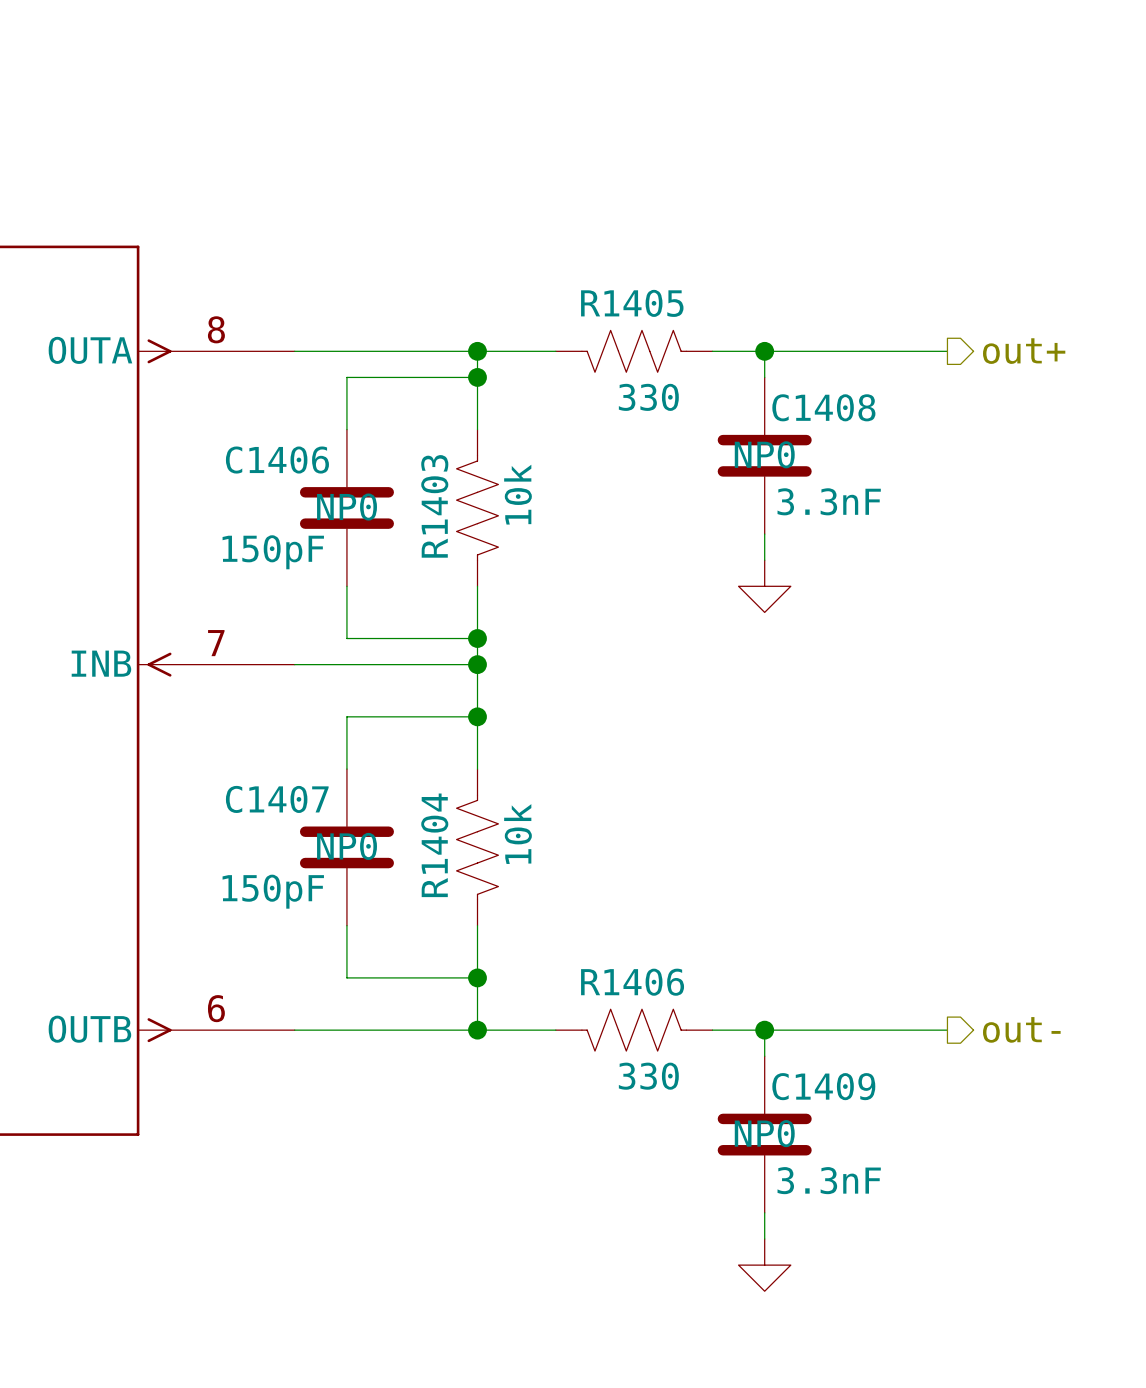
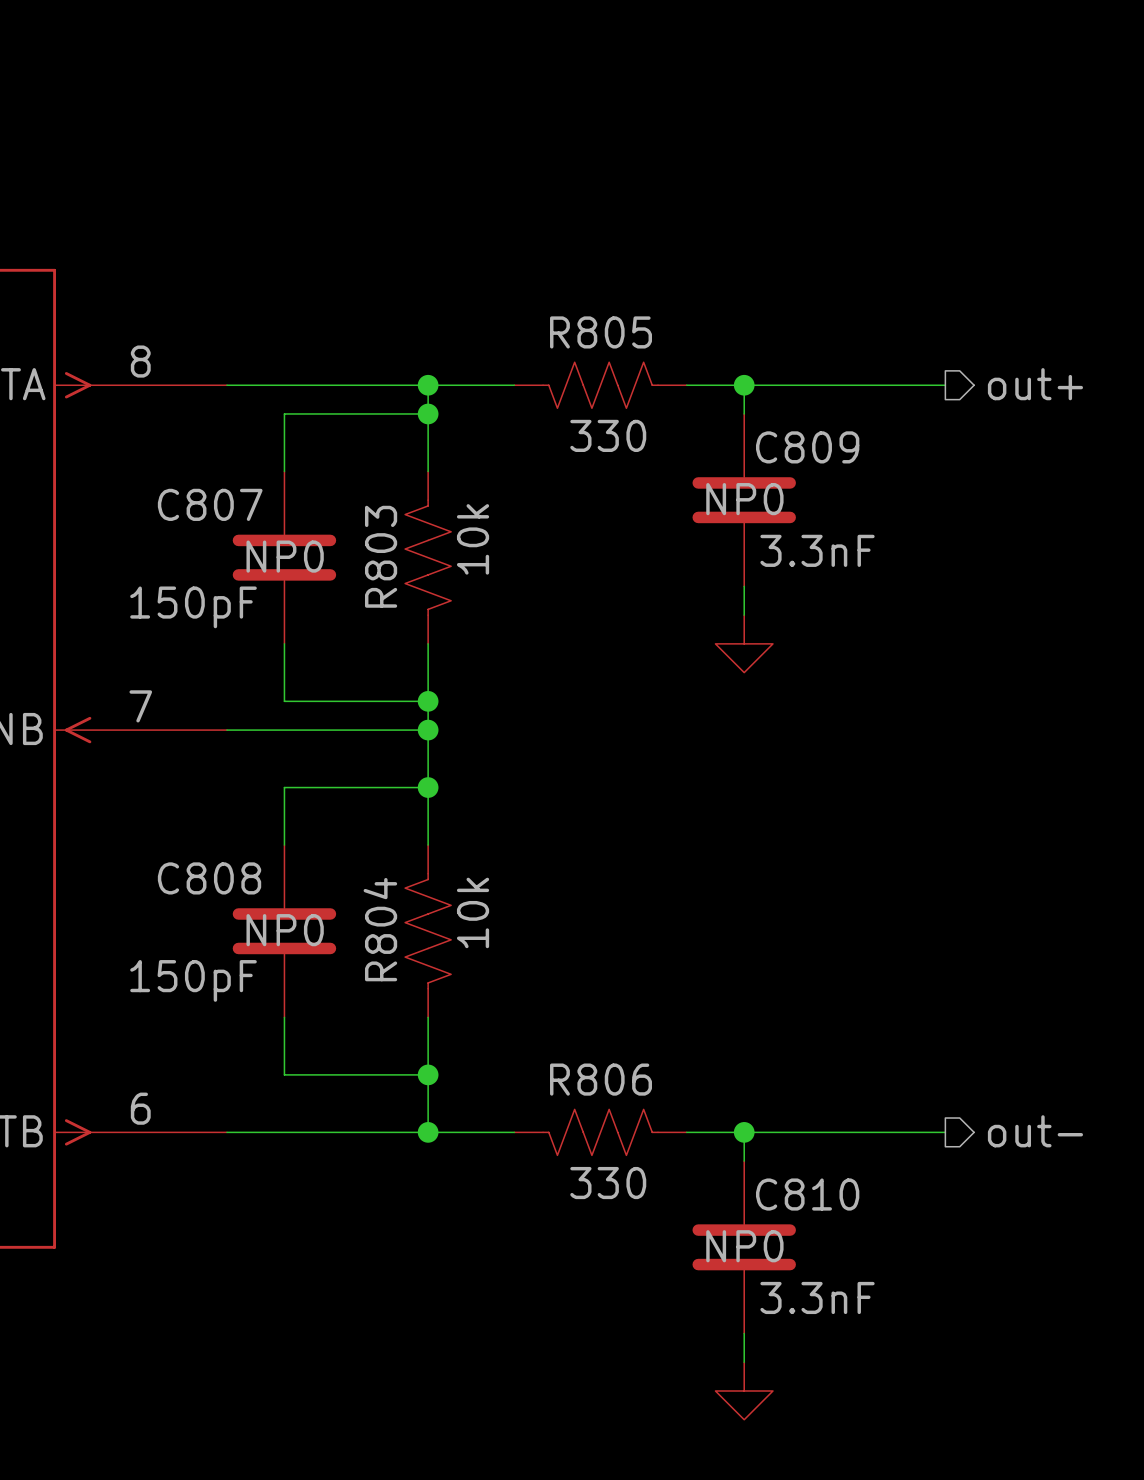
R1405 name: R1405 (632, 303) -> R805 (601, 332)
C1408 name: C1408 (823, 407) -> C809 (807, 447)
C1406 name: C1406 (277, 460) -> C807 (210, 504)
R1403 name: R1403 (434, 506) -> R803 (381, 556)
C1407 name: C1407 (277, 799) -> C808 (209, 878)
R1404 name: R1404 (434, 845) -> R804 (380, 929)
R1406 name: R1406 (632, 982) -> R806 (601, 1079)
C1409 name: C1409 (823, 1086) -> C810 (807, 1194)

